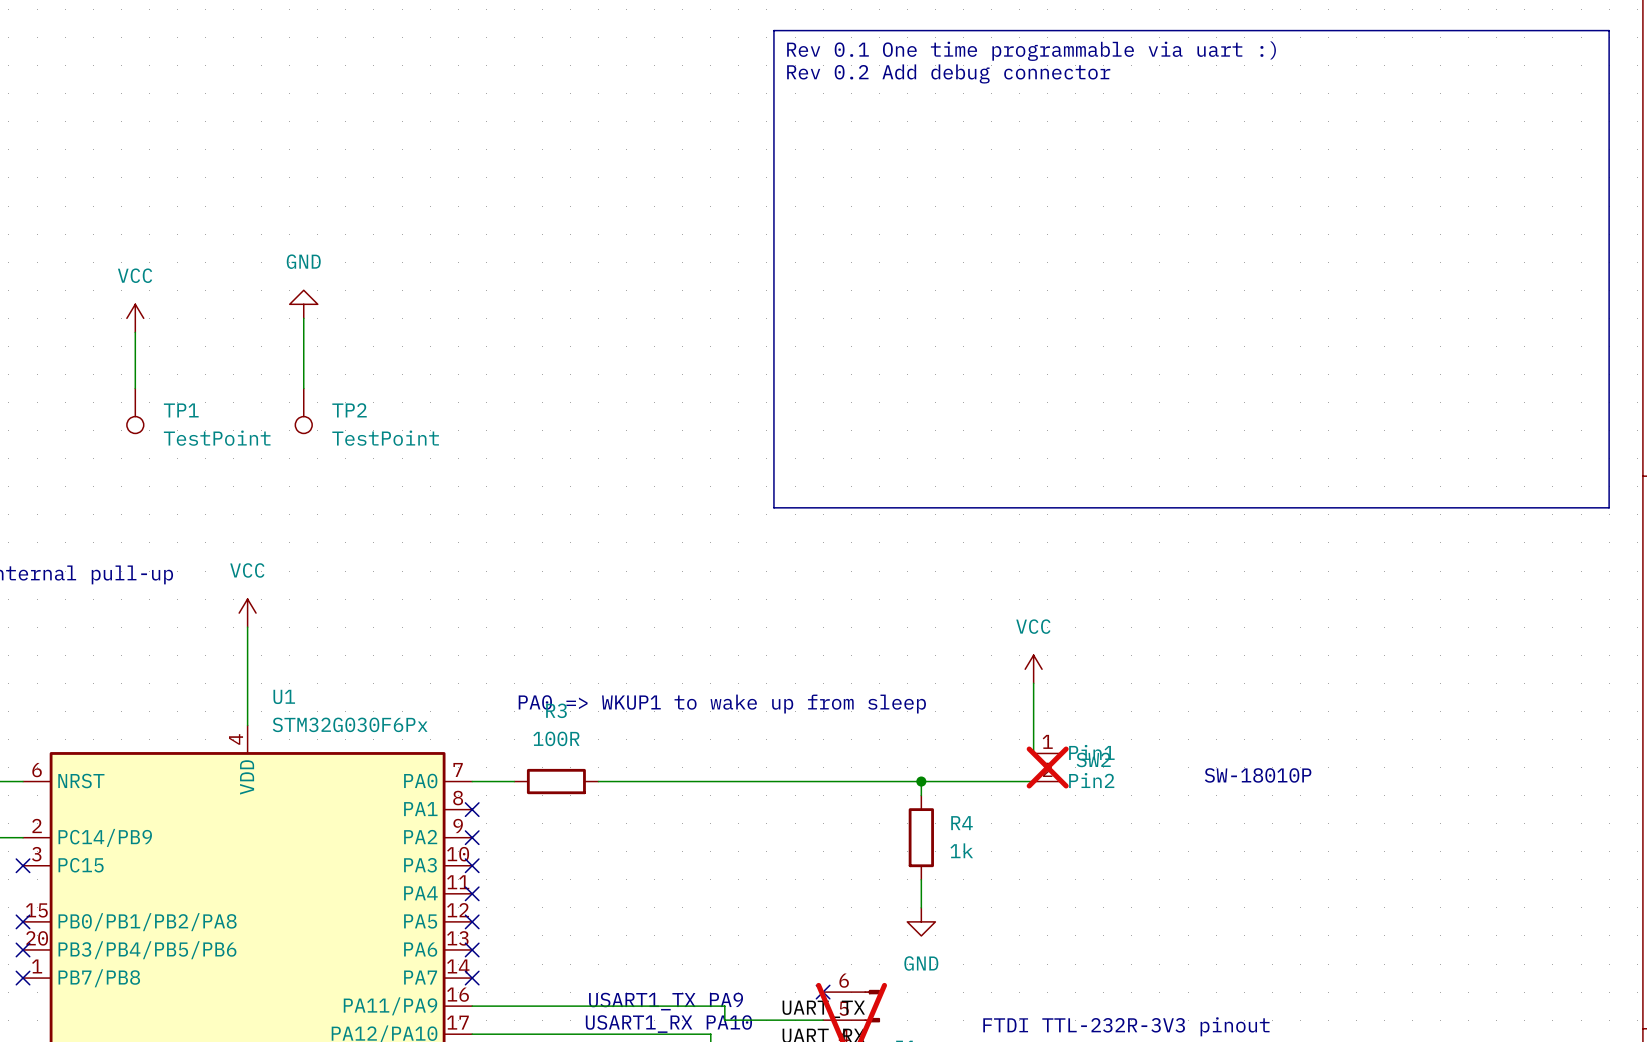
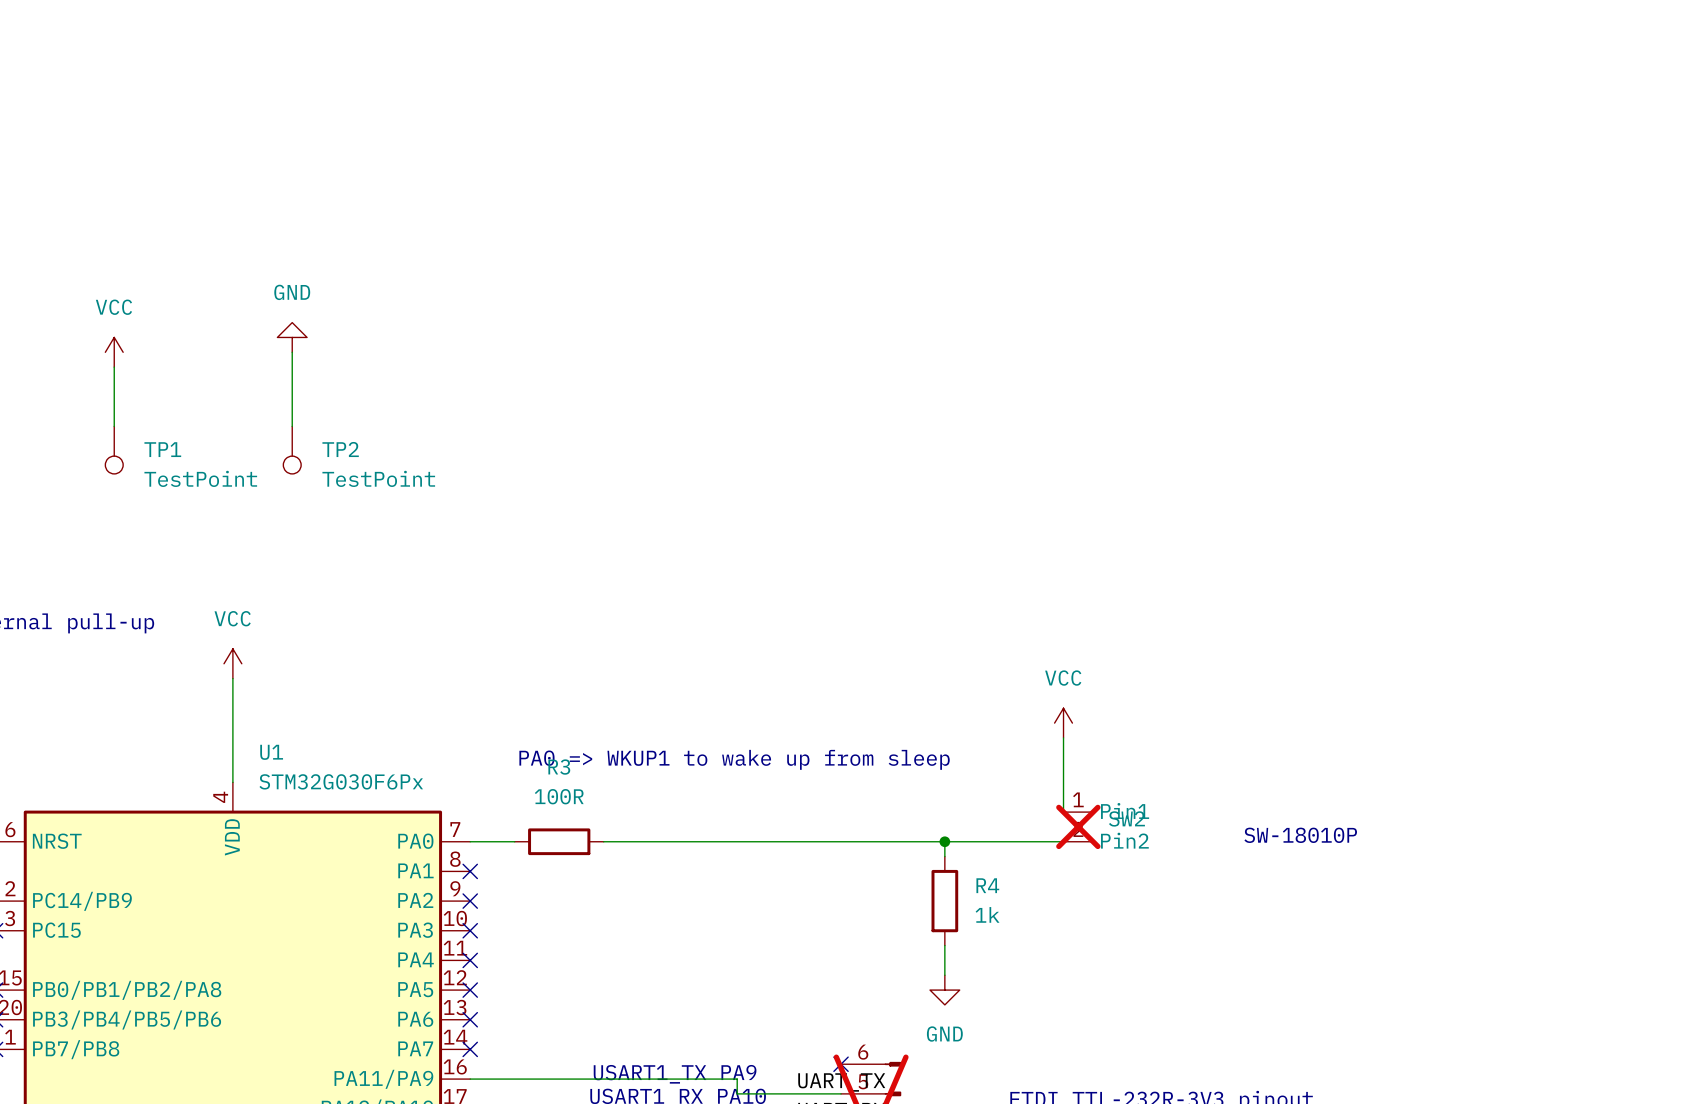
line: (773, 30) (1609, 30) (1609, 507) (773, 507) (773, 30) -> none
text: Rev 0.1 One time programmable via uart :) (1031, 51) -> none
text: Rev 0.2 Add debug connector (948, 73) -> none

